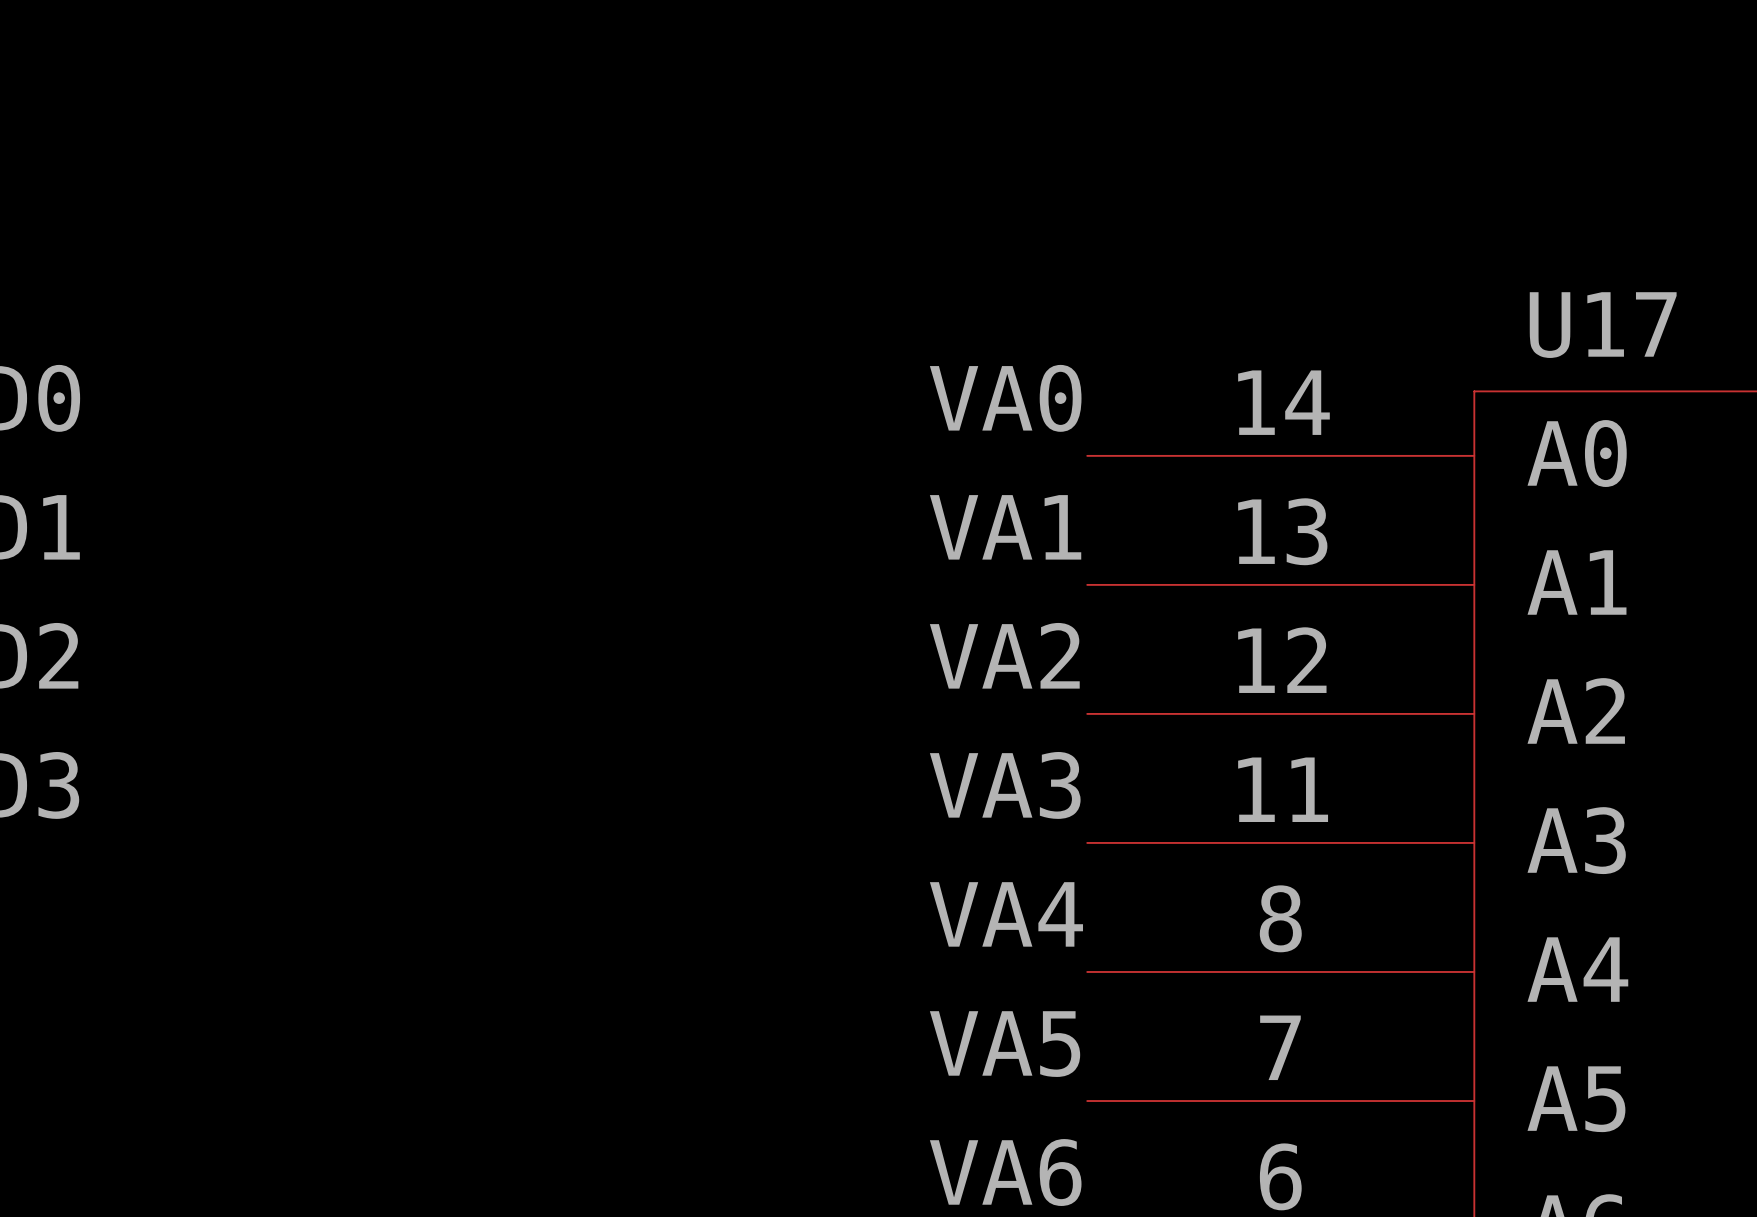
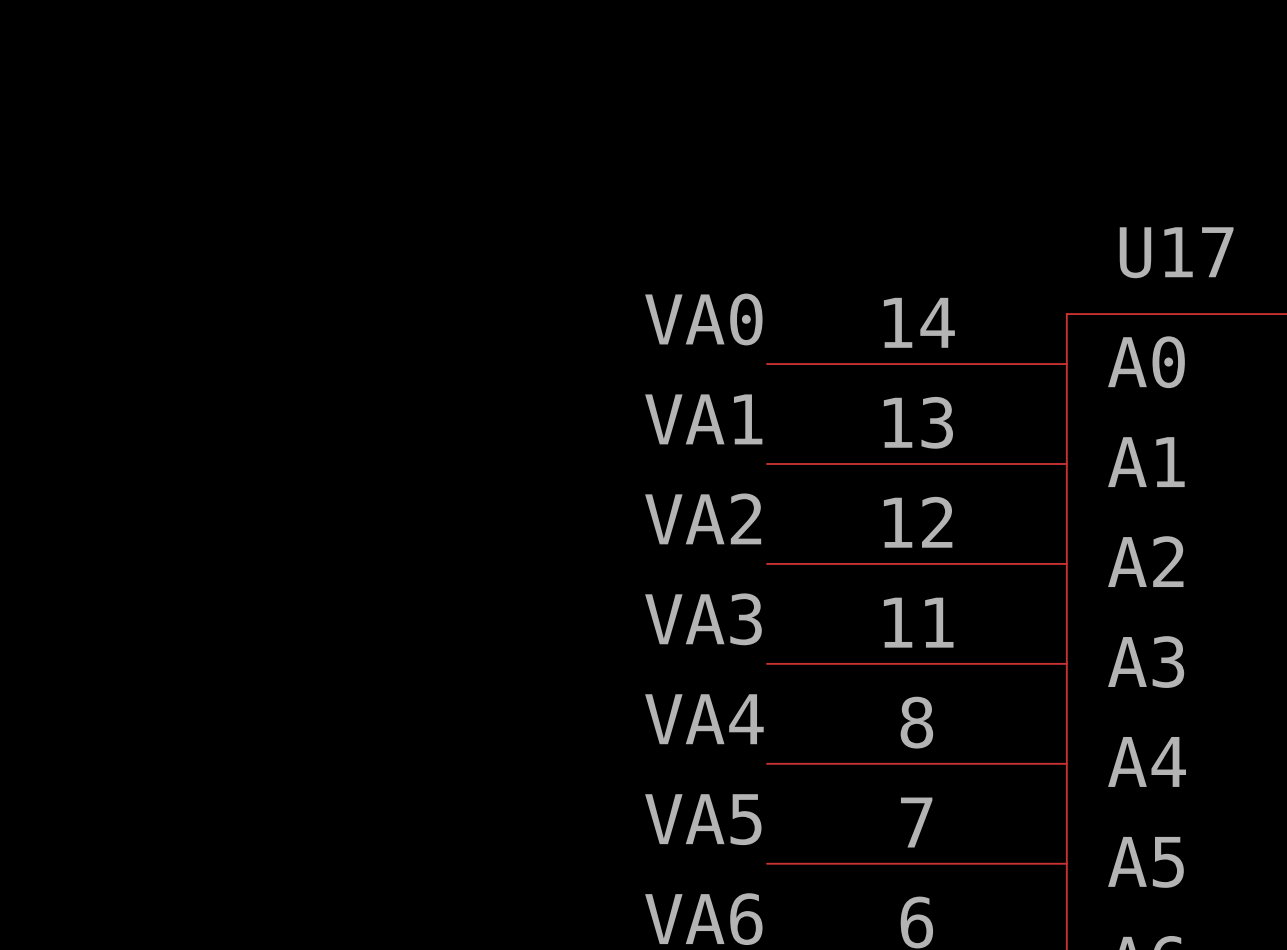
U17 name position: U17 (1603, 325) -> U17 (1176, 252)

